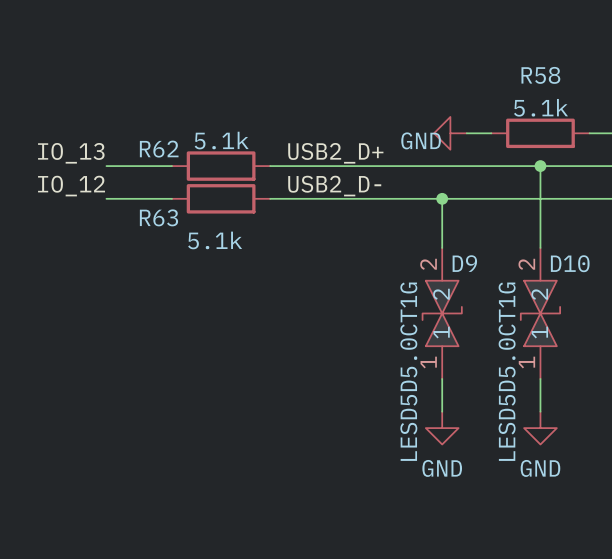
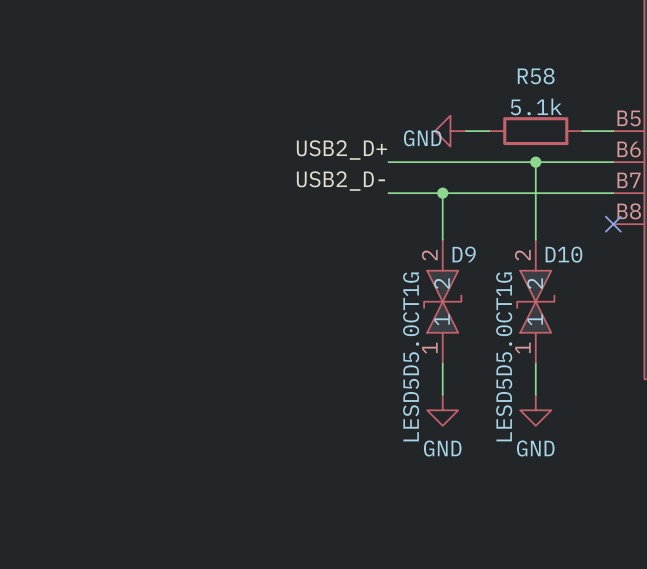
label: IO_13 (71, 153) -> none
wire: (106, 166) (171, 166) -> none
R62: 5.1k (221, 166) -> none
wire: (270, 166) (384, 166) -> none
label: IO_12 (71, 186) -> none
wire: (106, 198) (171, 198) -> none
R63: 5.1k (221, 198) -> none
wire: (270, 198) (384, 198) -> none

